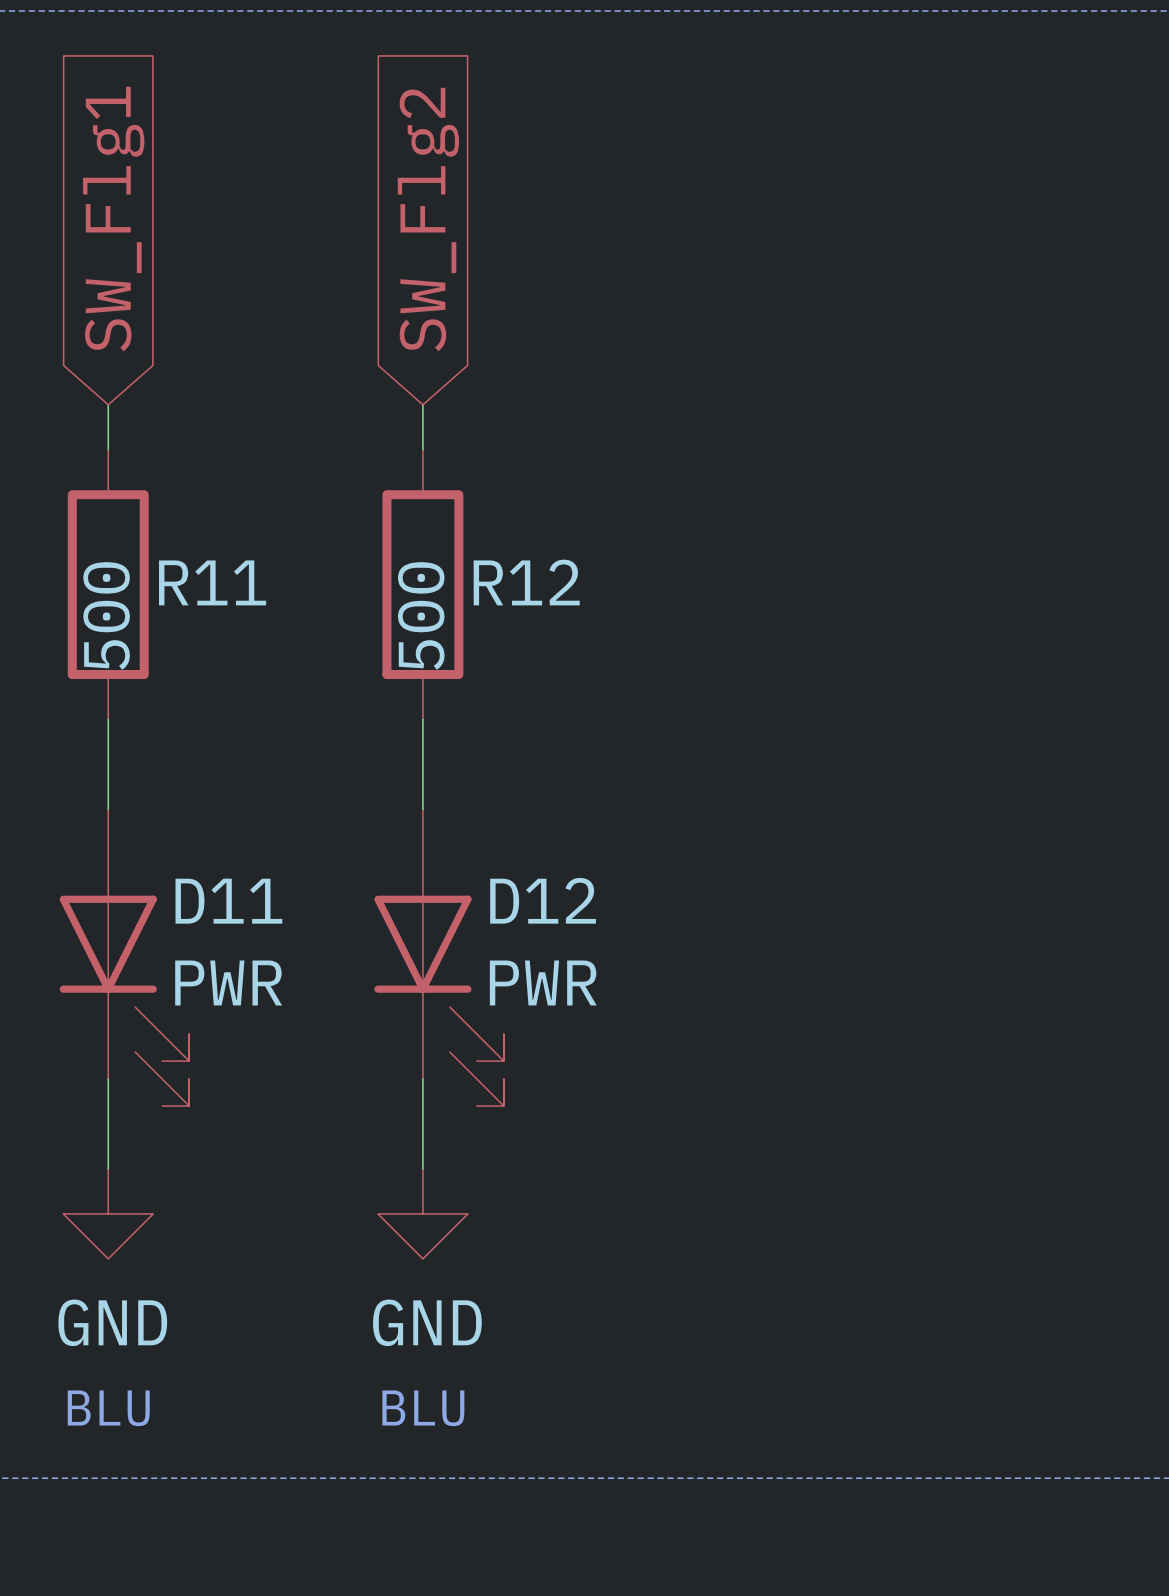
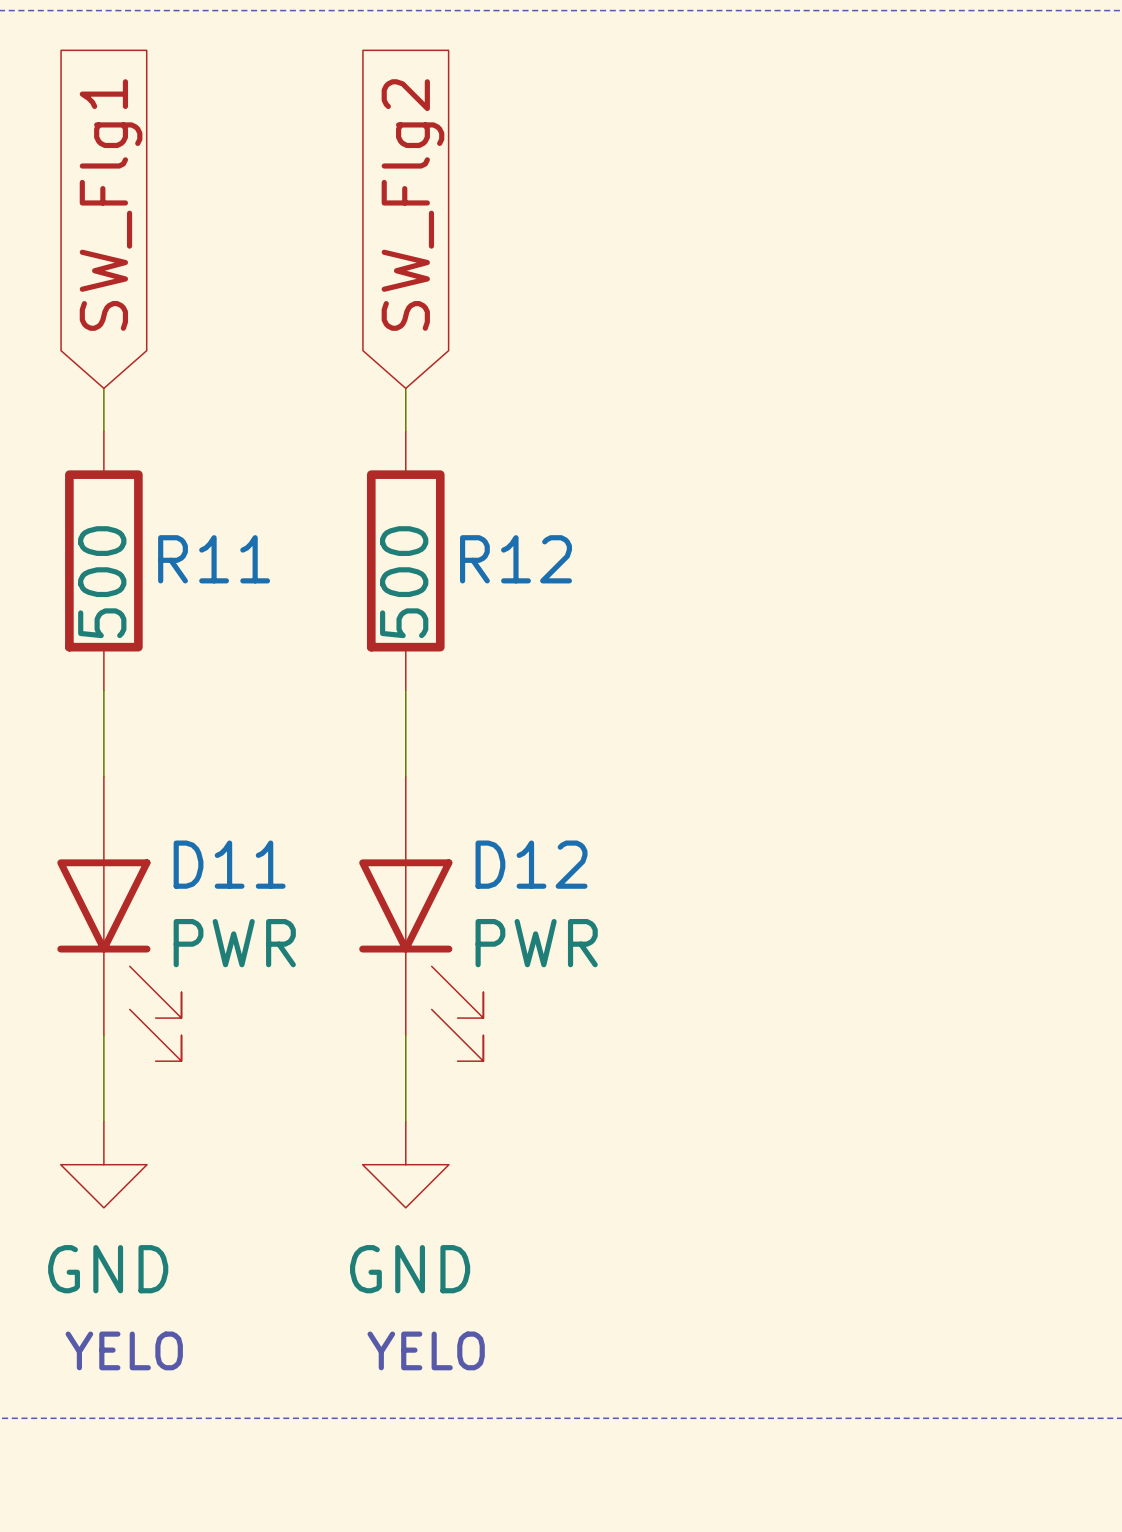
text: BLU (108, 1408) -> none
text: none -> YELO (124, 1350)
text: BLU (423, 1408) -> none
text: none -> YELO (426, 1350)

